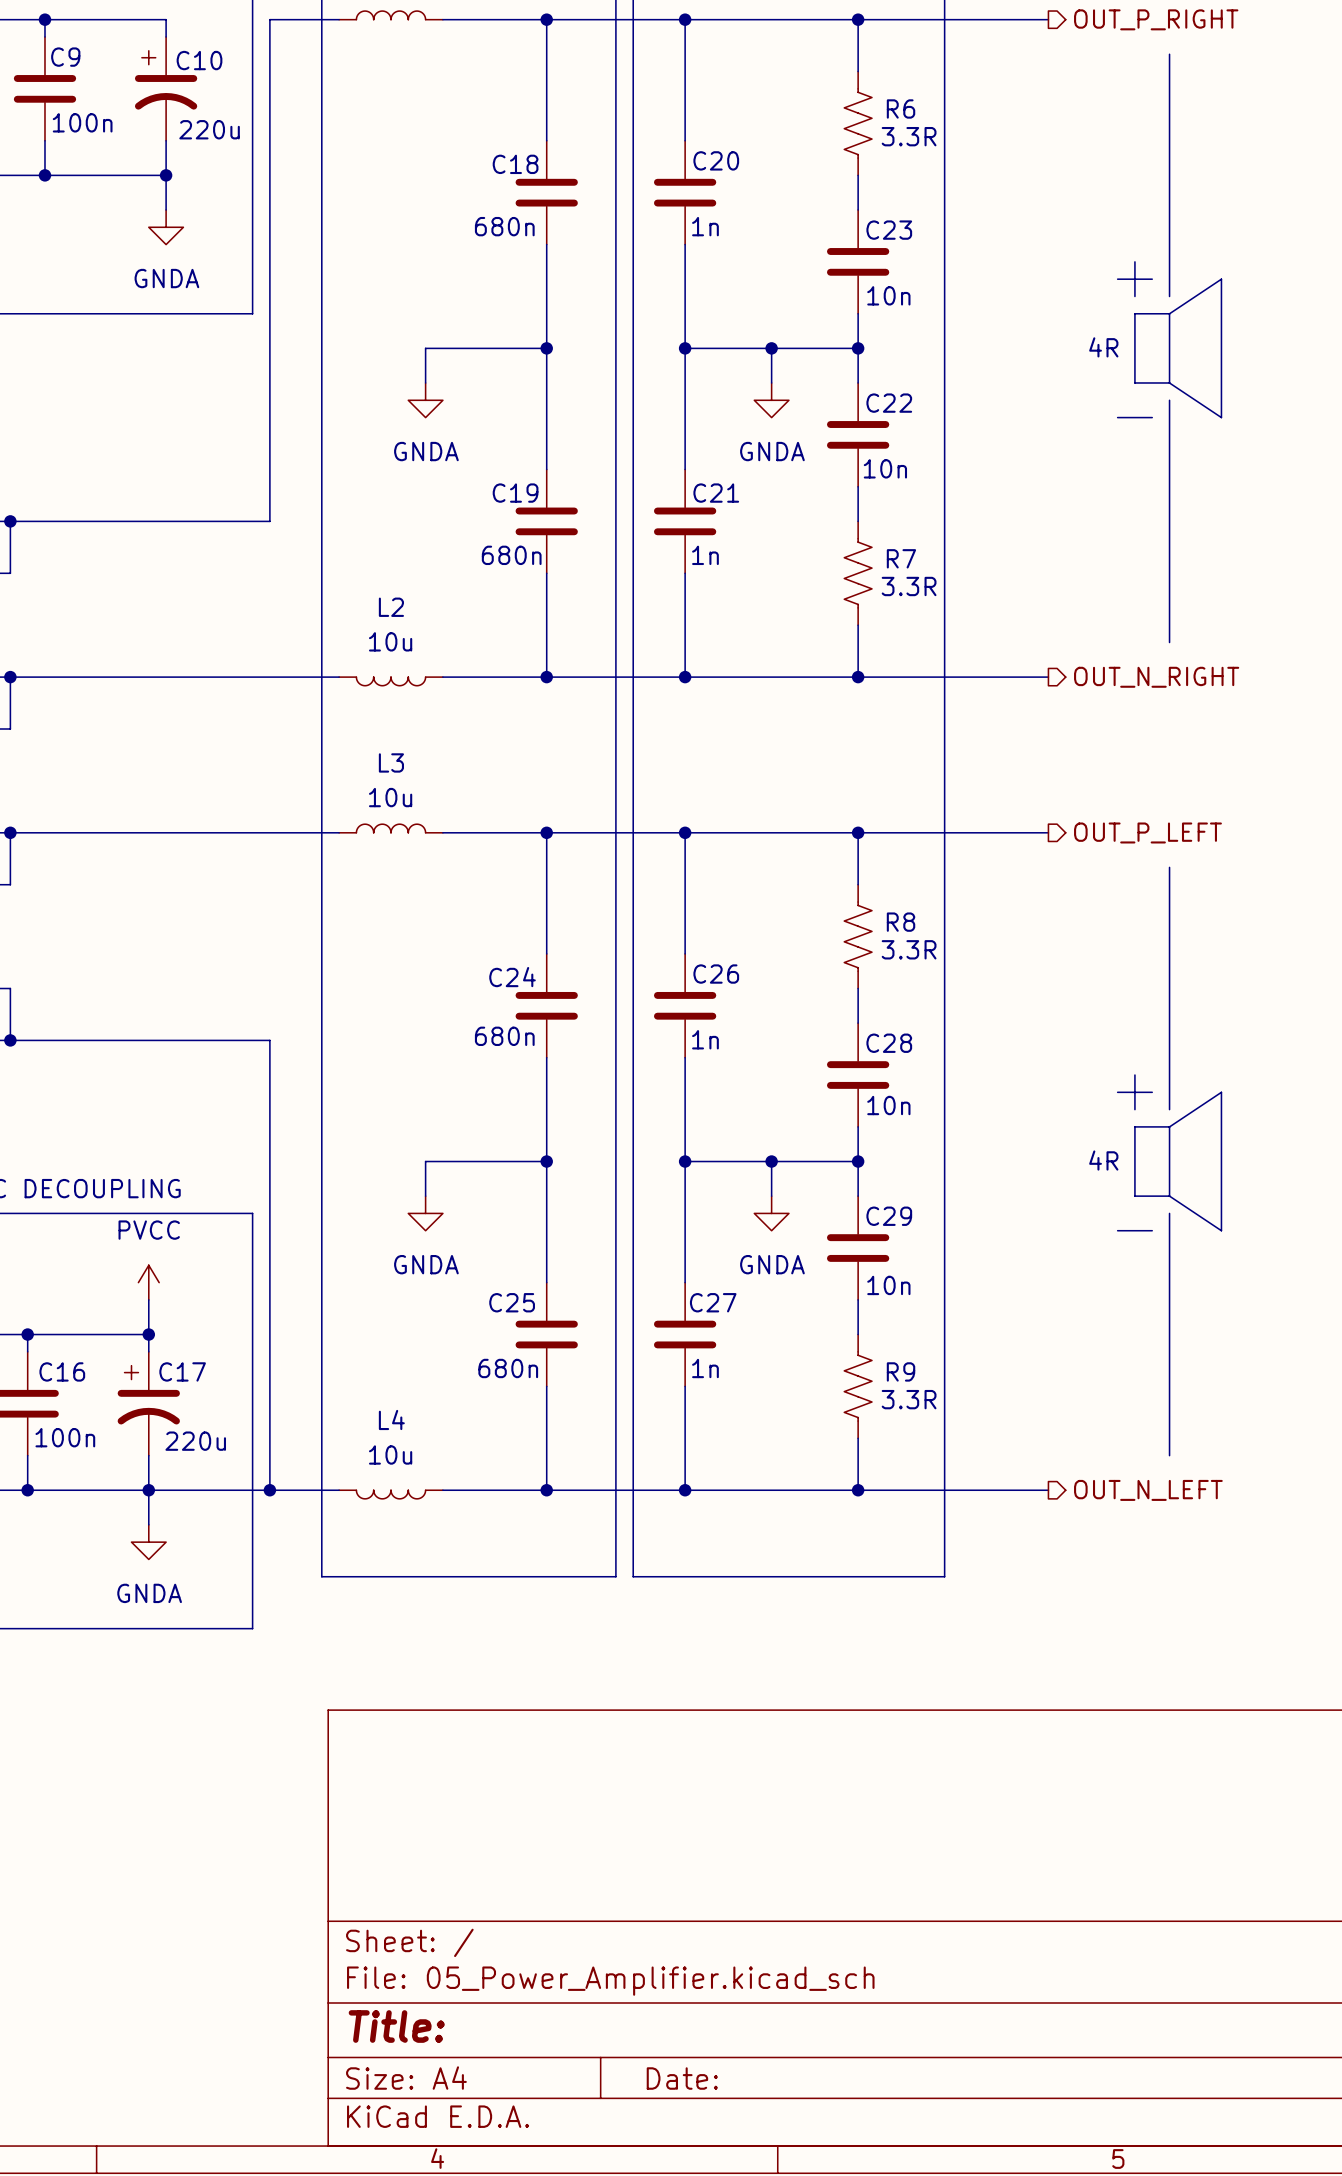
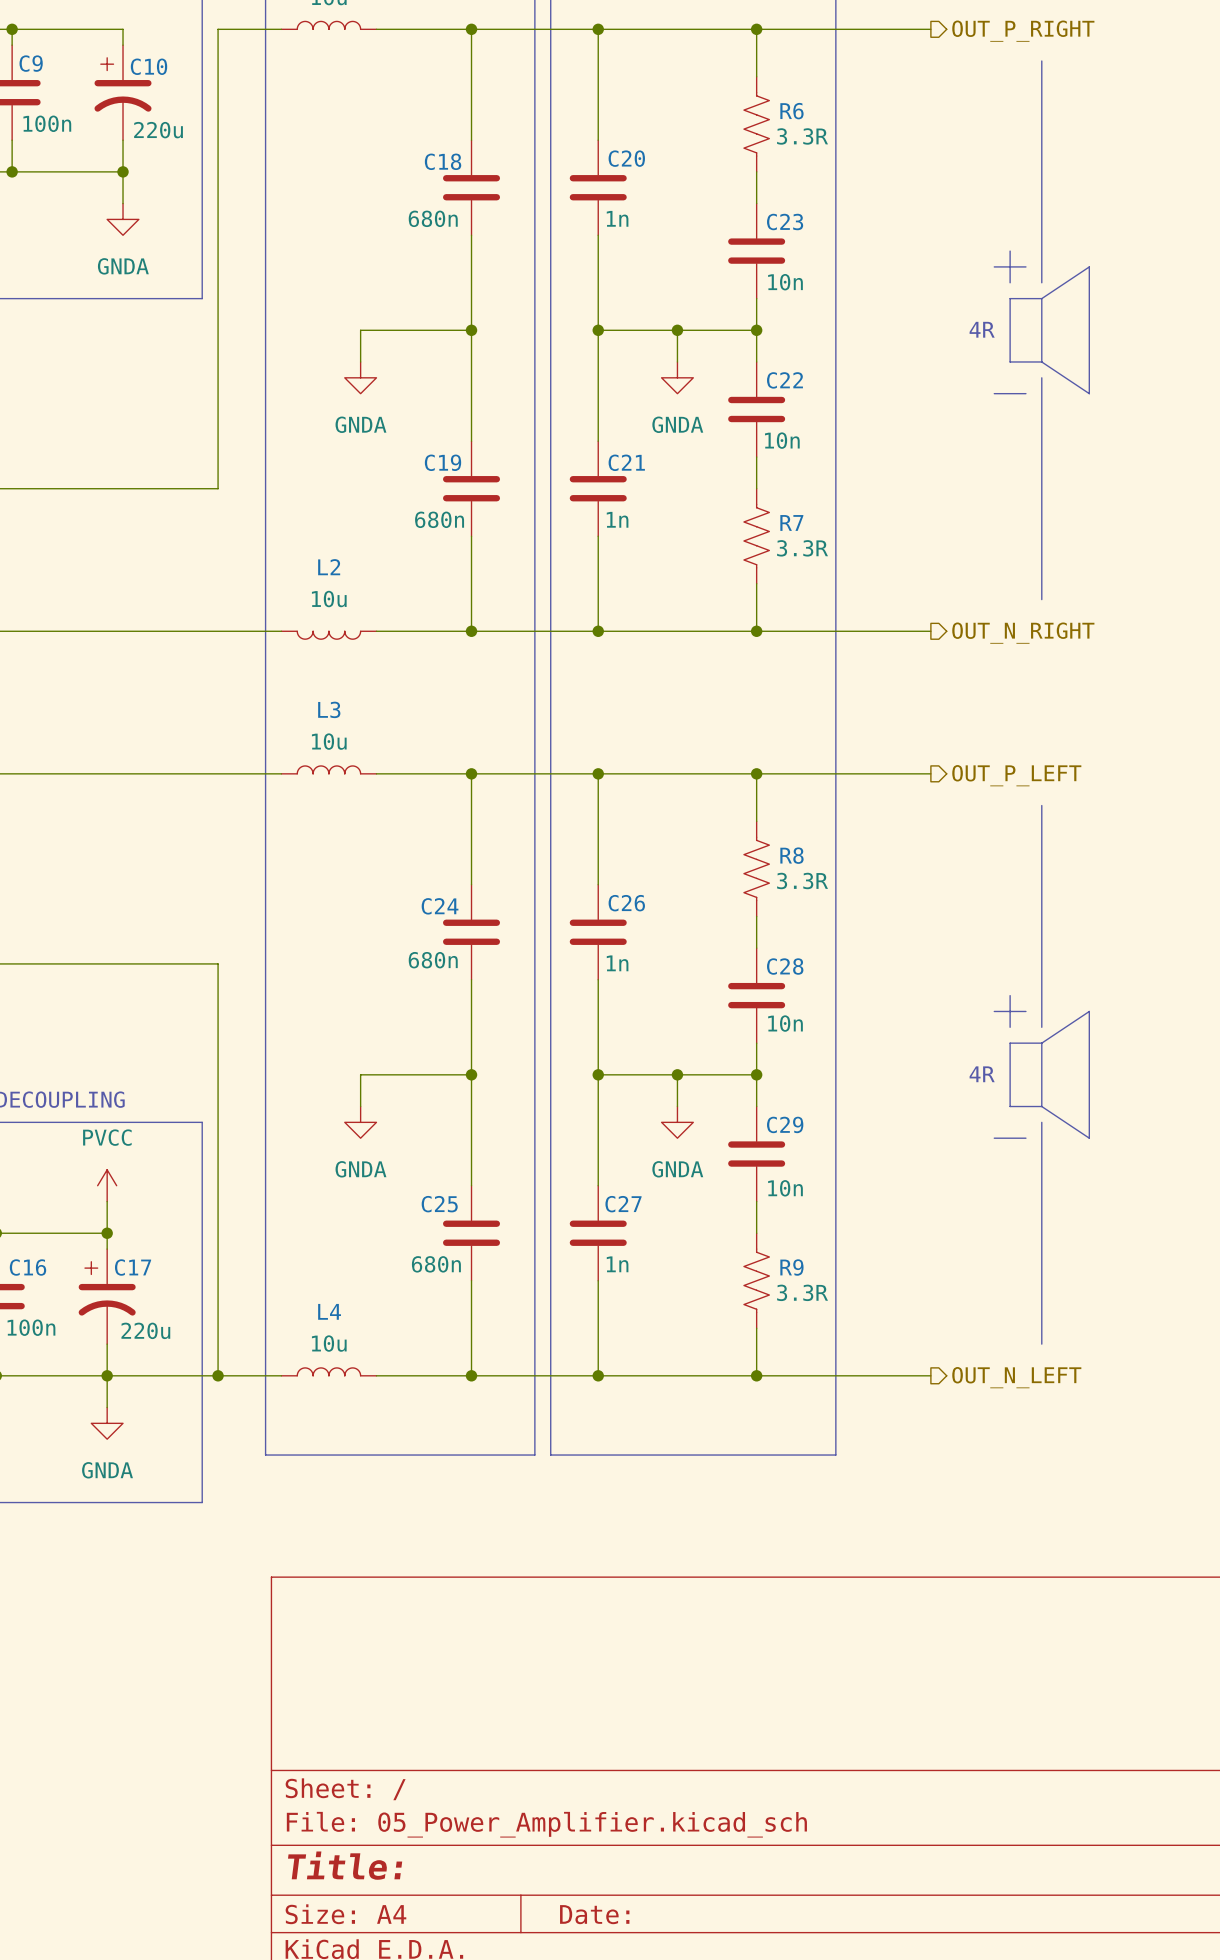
L4 rotation: 0° (391, 1494) -> 180° (328, 1371)

